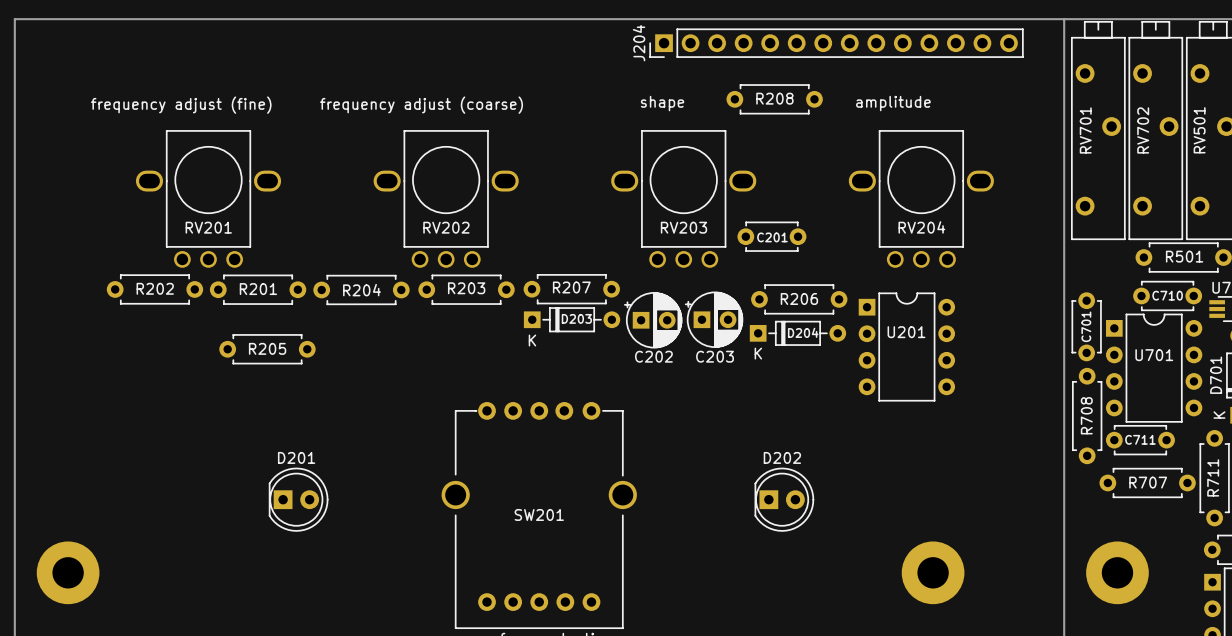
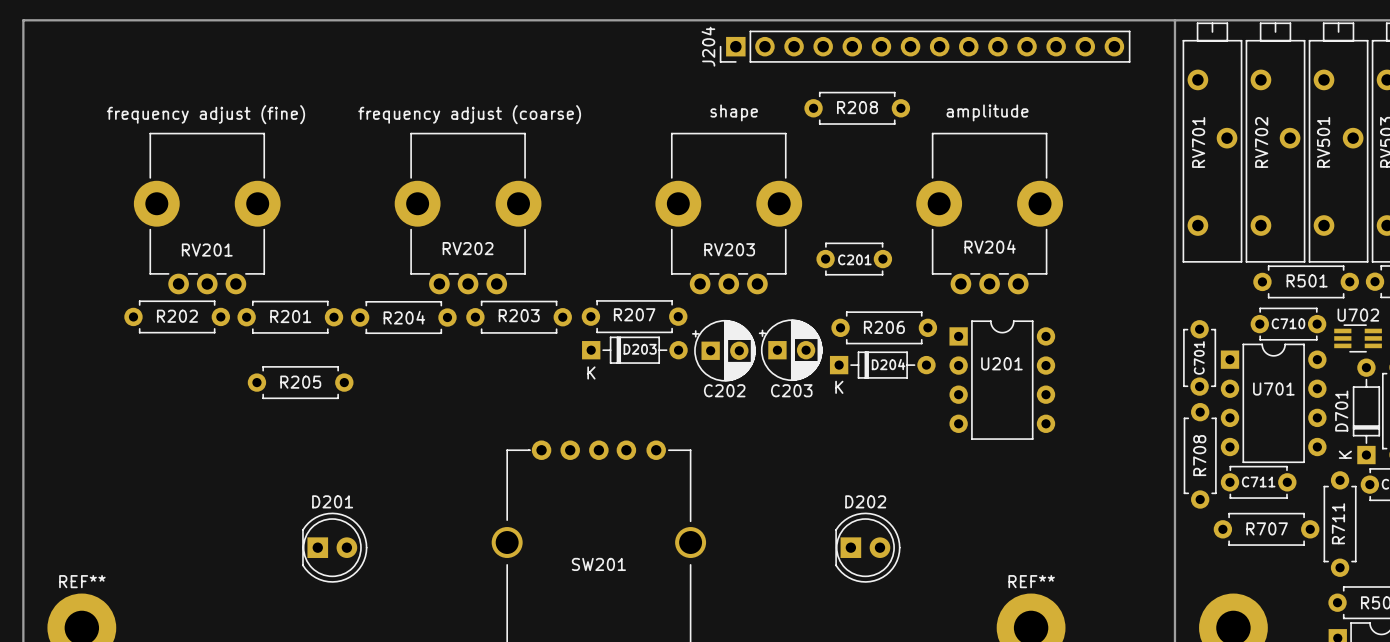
RV201 footprint: [135, 130, 282, 268] -> [133, 132, 281, 295]
RV202 footprint: [373, 130, 519, 268] -> [394, 132, 542, 295]
RV203 footprint: [611, 130, 757, 268] -> [655, 132, 803, 295]
RV204 footprint: [848, 130, 994, 268] -> [916, 132, 1063, 295]
REF** name: none -> REF** (82, 581)
REF** name: none -> REF** (1031, 581)

